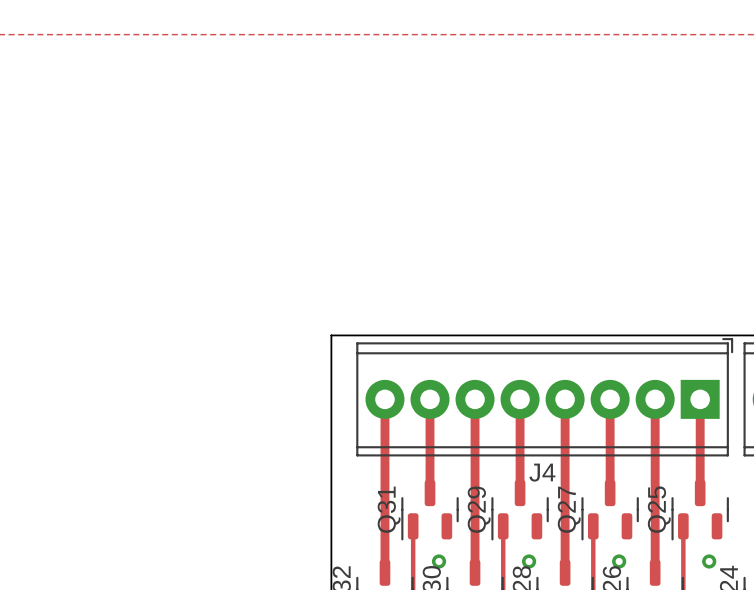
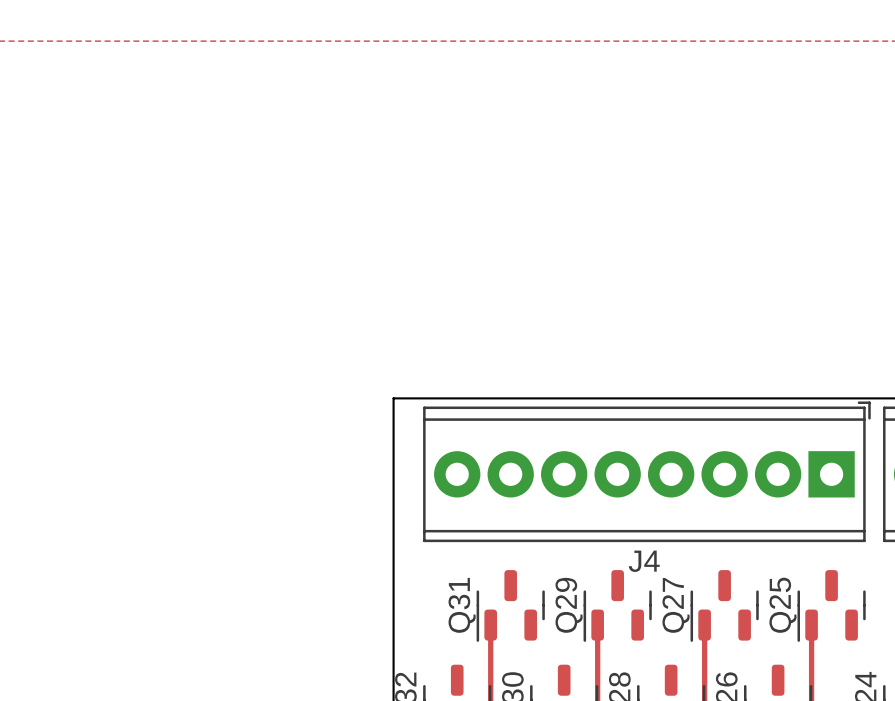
track: (384, 399) (384, 572) -> none
track: (430, 399) (430, 493) -> none
track: (475, 399) (475, 572) -> none
track: (520, 399) (520, 493) -> none
track: (565, 399) (565, 572) -> none
track: (610, 399) (610, 493) -> none
track: (655, 399) (655, 572) -> none
track: (700, 399) (700, 493) -> none
via: (439, 561) -> none
via: (529, 561) -> none
via: (619, 561) -> none
via: (709, 561) -> none

